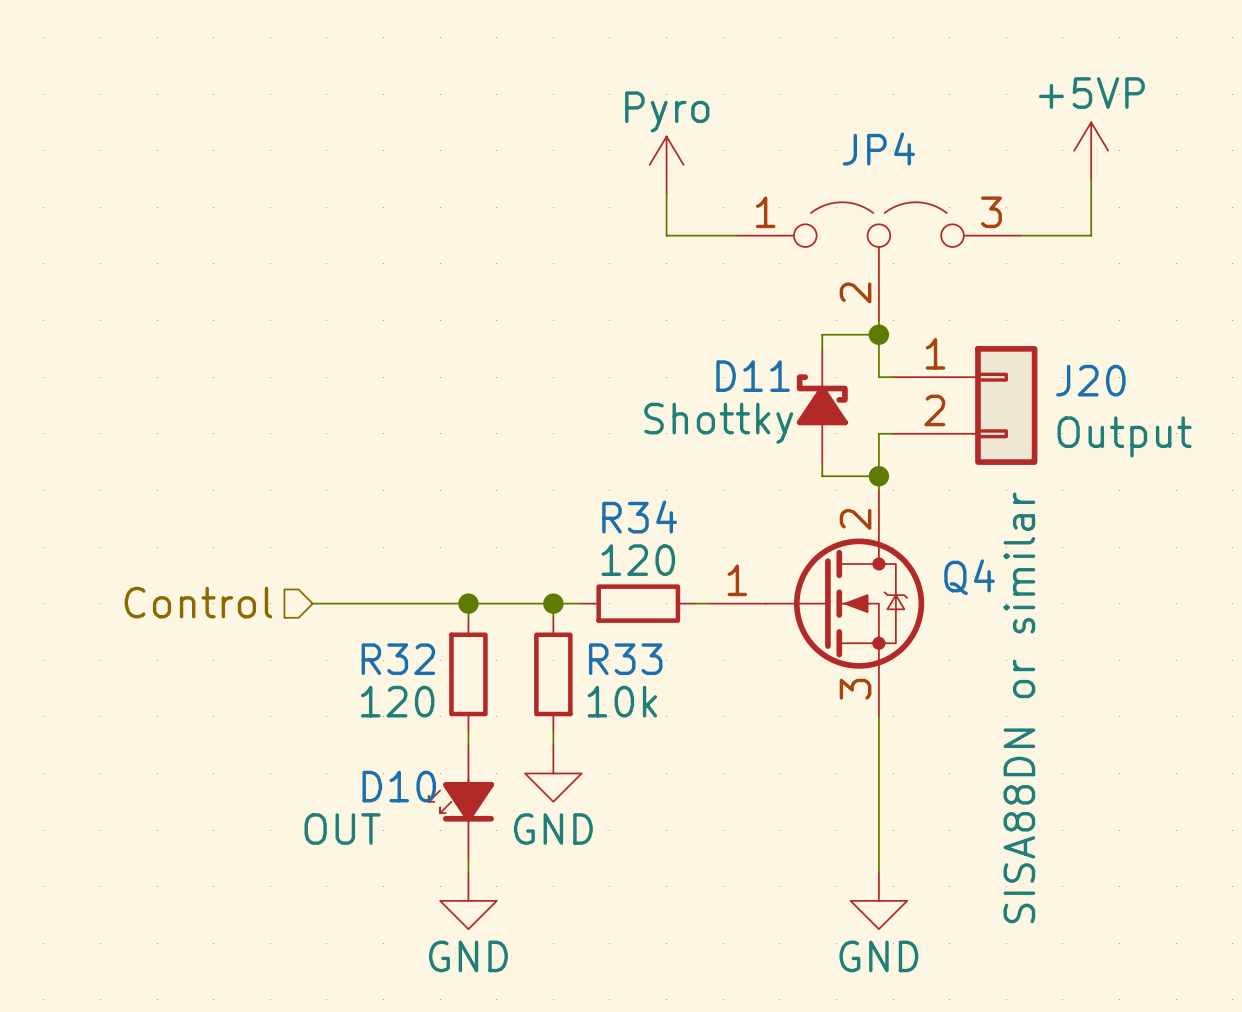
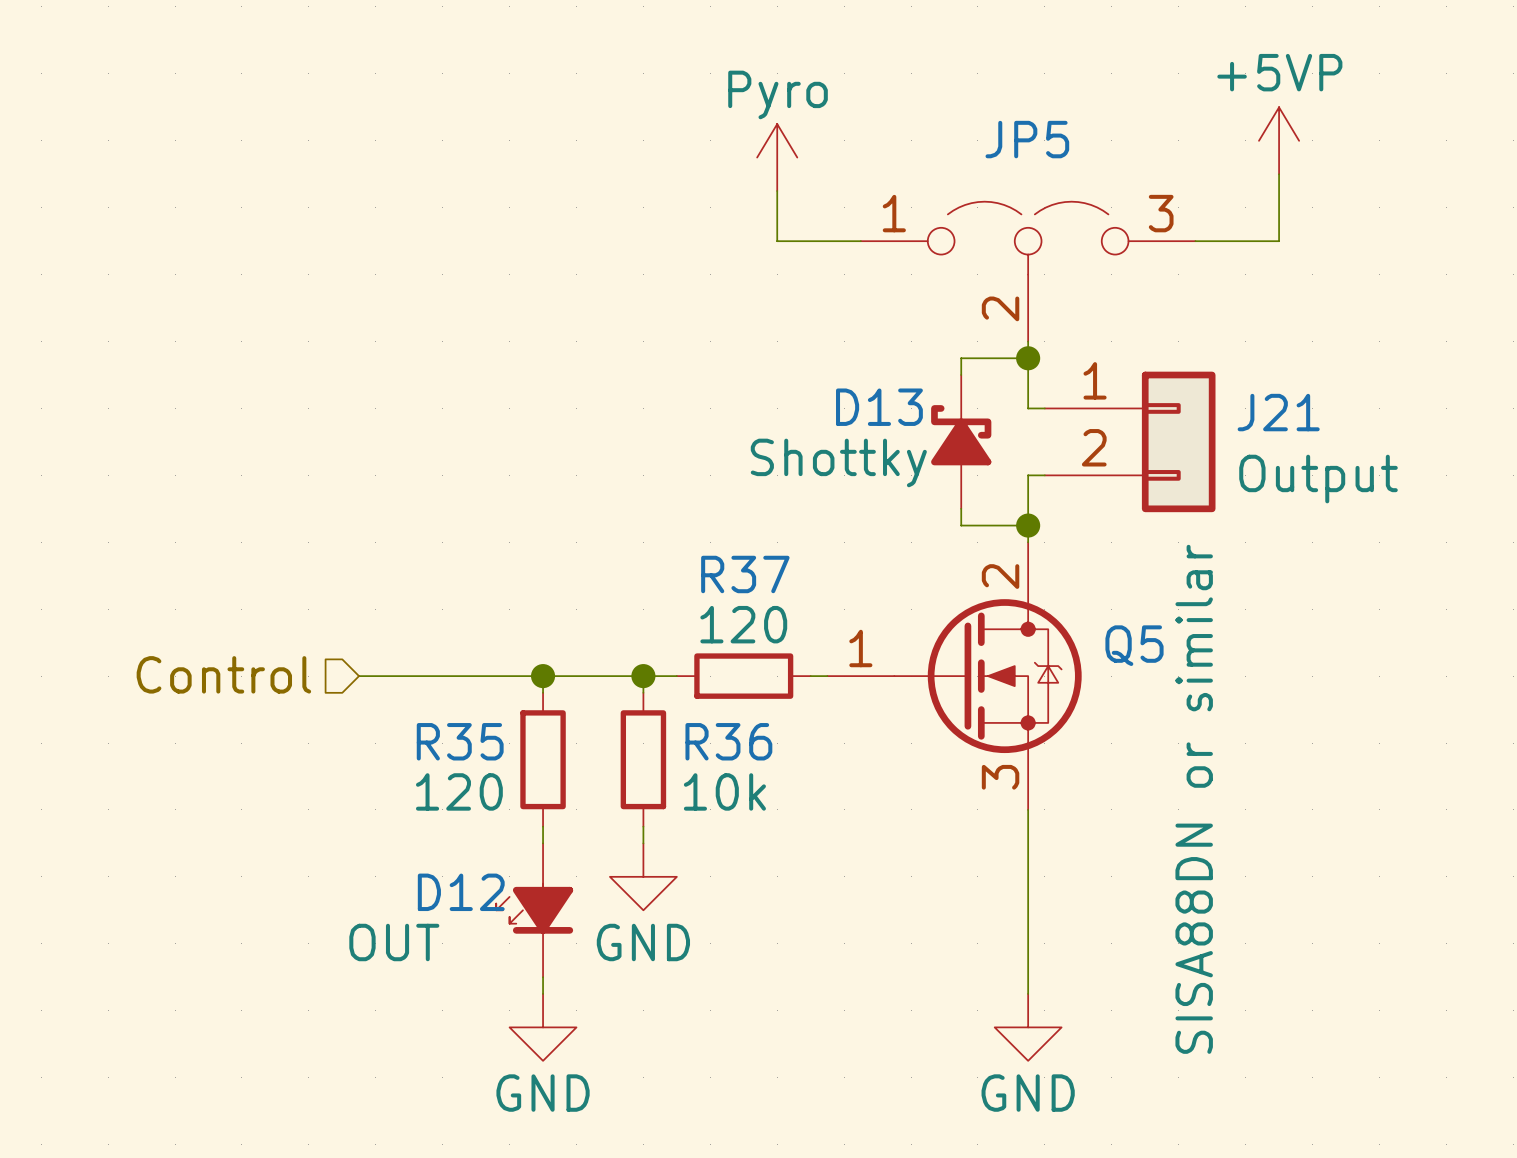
JP4 name: JP4 (878, 148) -> JP5 (1027, 139)
D11 name: D11 (753, 376) -> D13 (879, 407)
J20 name: J20 (1090, 380) -> J21 (1278, 412)
R34 name: R34 (639, 516) -> R37 (745, 574)
Q4 name: Q4 (969, 577) -> Q5 (1134, 645)
R32 name: R32 (398, 659) -> R35 (460, 741)
R33 name: R33 (625, 659) -> R36 (728, 741)
D10 name: D10 (399, 786) -> D12 (461, 892)

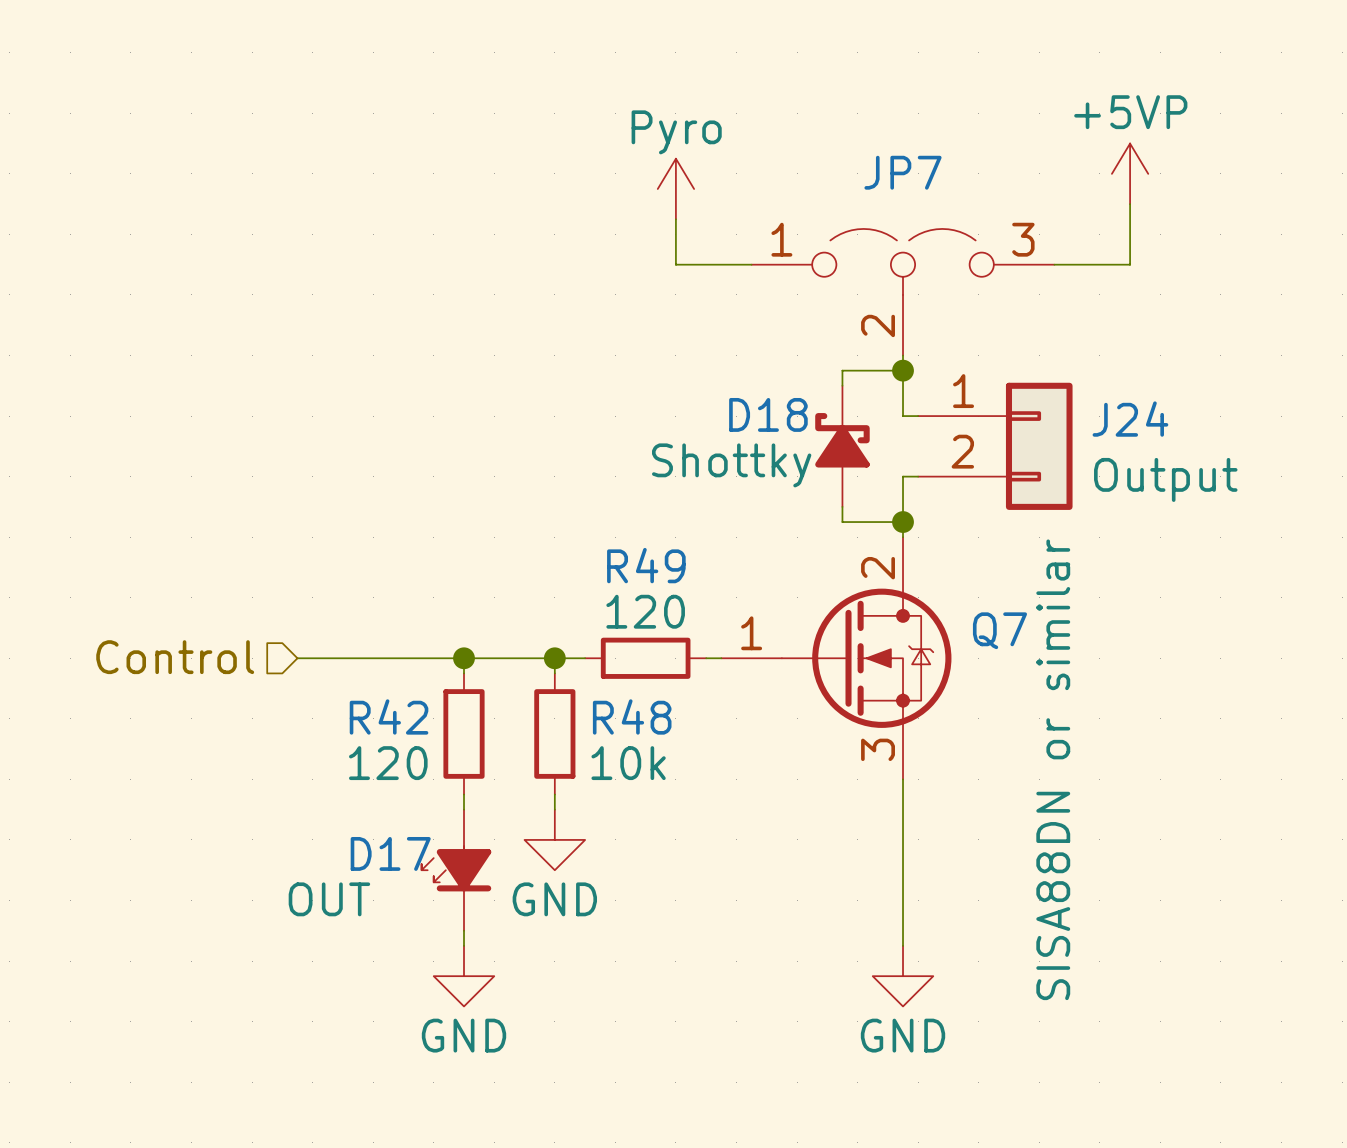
JP5 name: JP5 (1027, 139) -> JP7 (903, 172)
D13 name: D13 (879, 407) -> D18 (768, 414)
J21 name: J21 (1278, 412) -> J24 (1130, 419)
R37 name: R37 (745, 574) -> R49 (646, 565)
Q5 name: Q5 (1134, 645) -> Q7 (999, 630)
R35 name: R35 (460, 741) -> R42 (389, 716)
R36 name: R36 (728, 741) -> R48 (632, 716)
D12 name: D12 (461, 892) -> D17 (390, 853)

